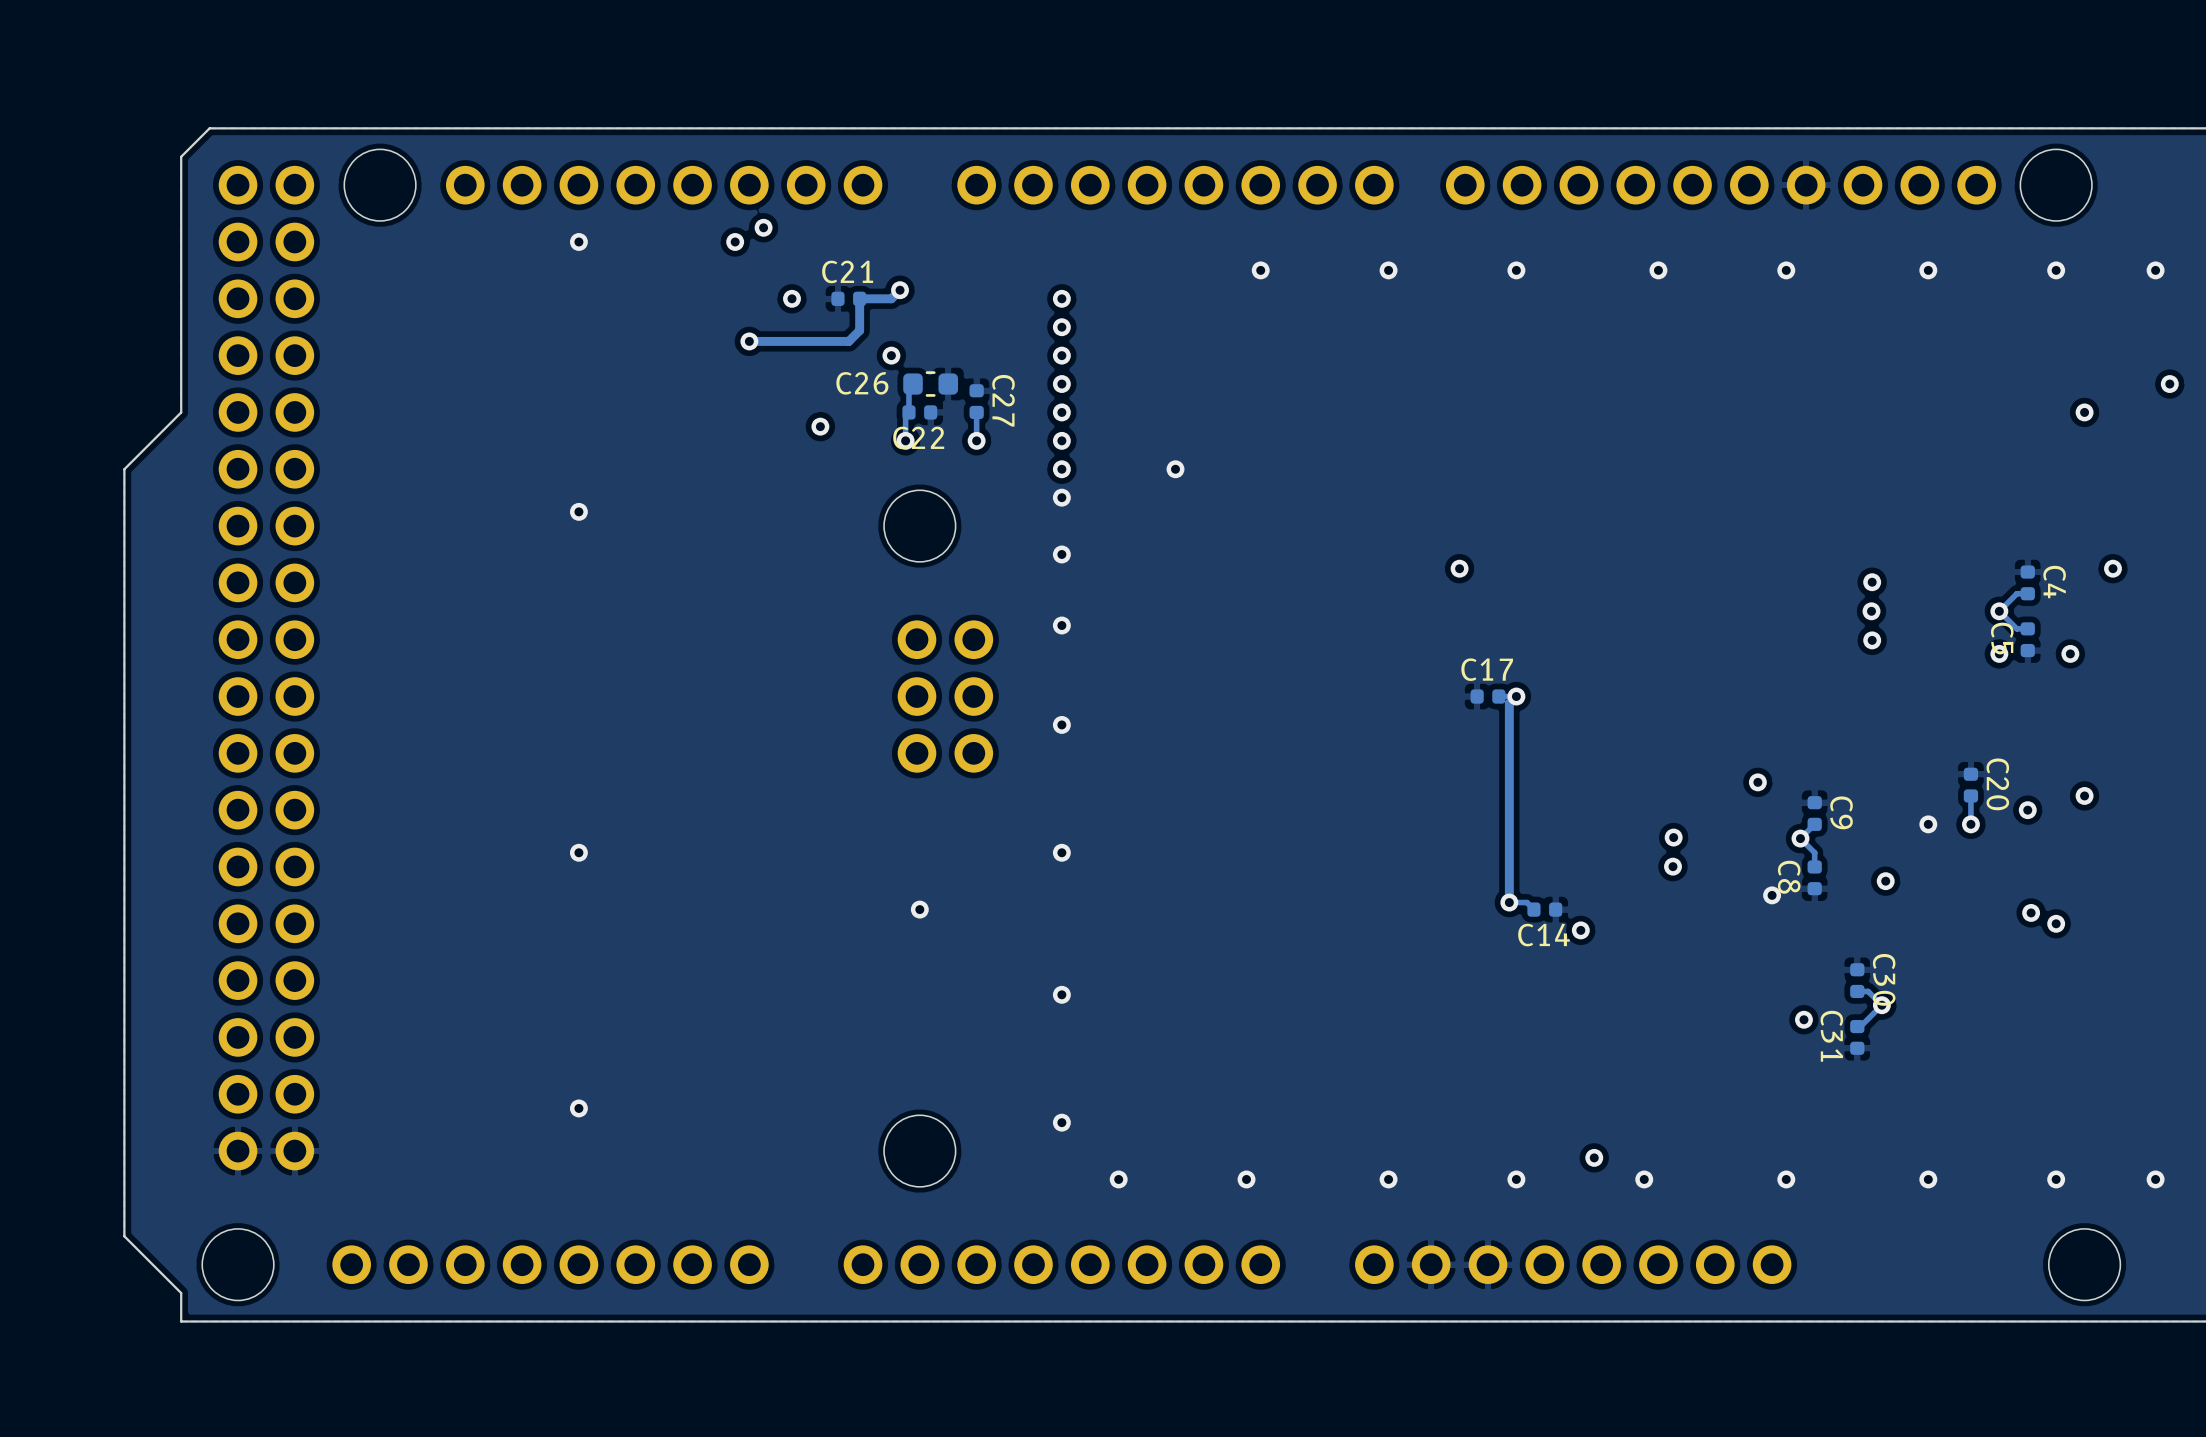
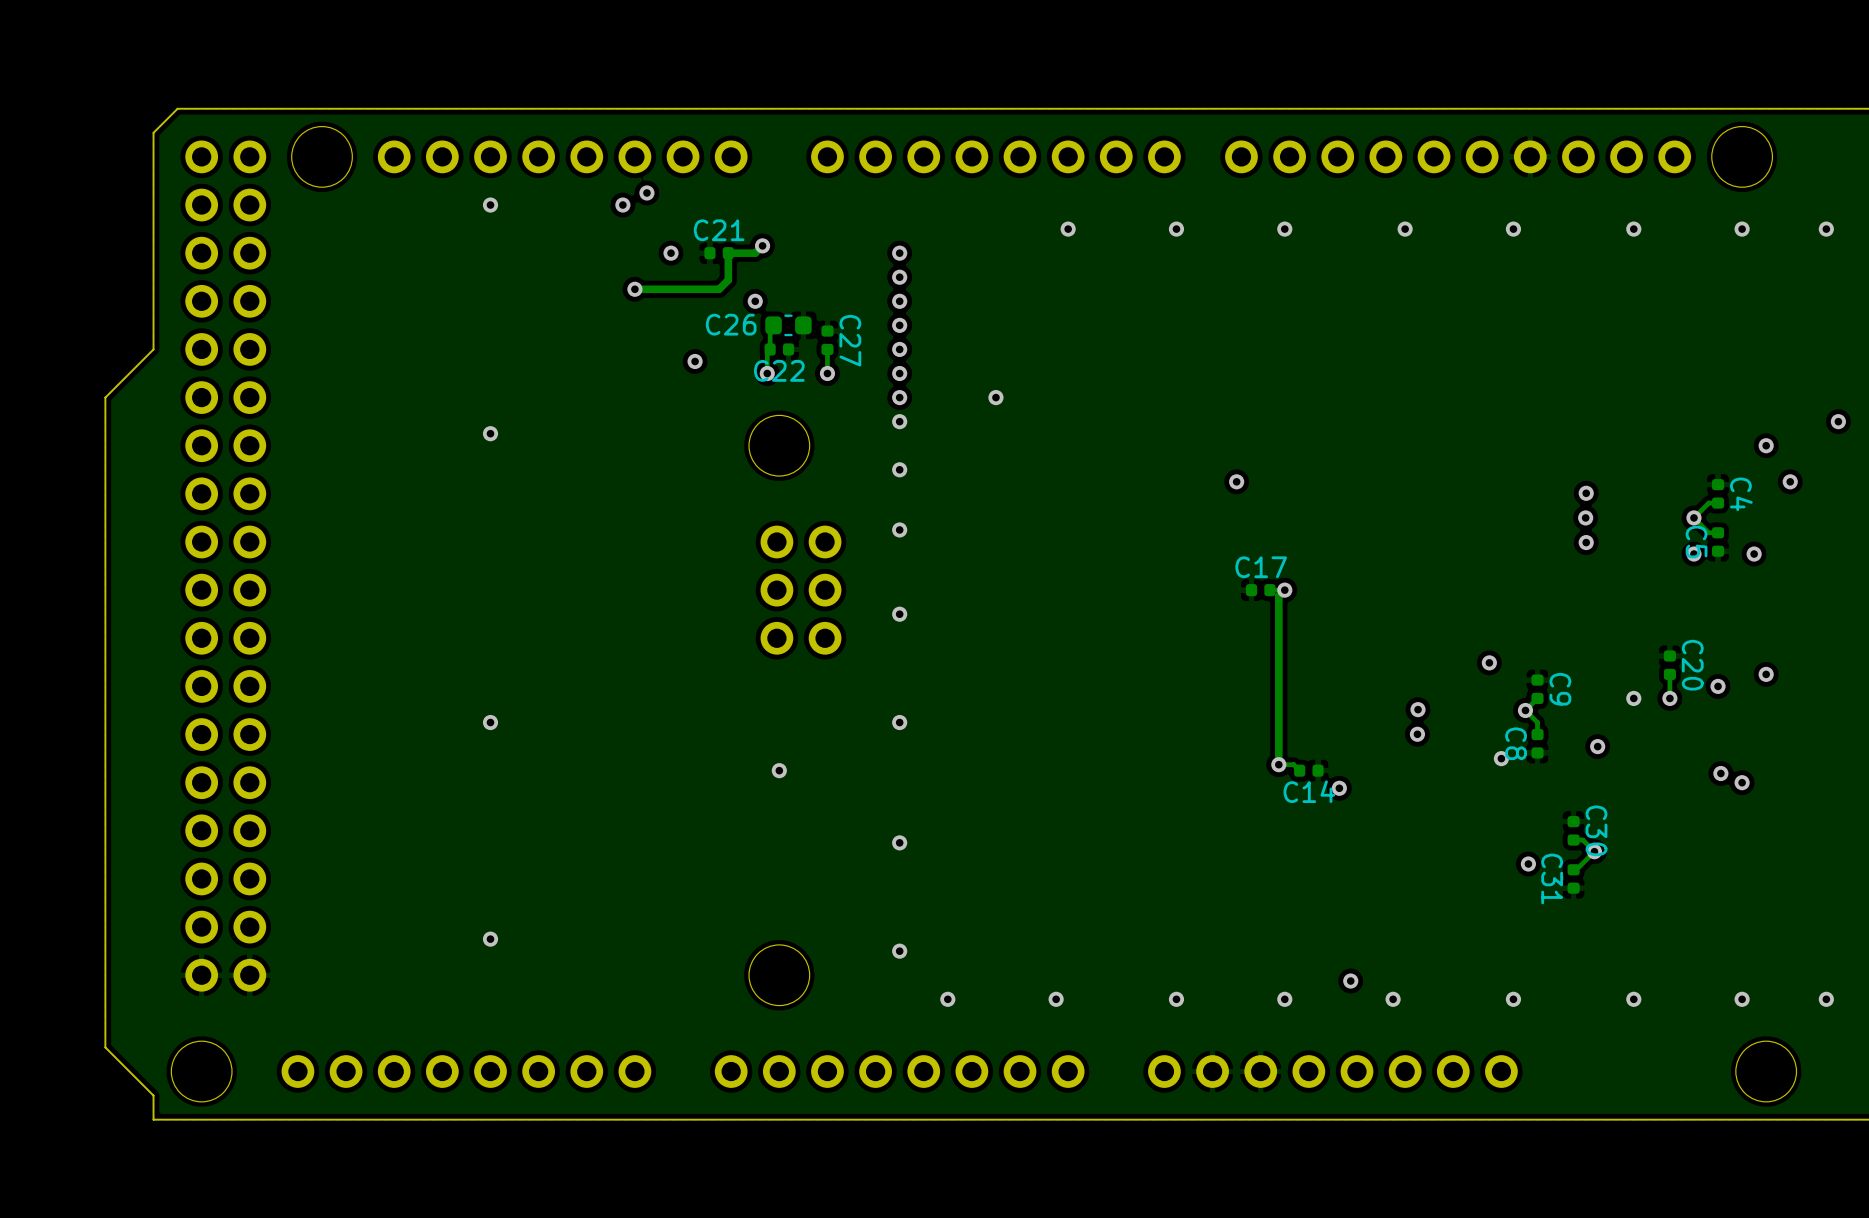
via: (2169, 384) -> none
via: (2084, 412) -> none
via: none -> (1838, 421)
via: none -> (1766, 445)

